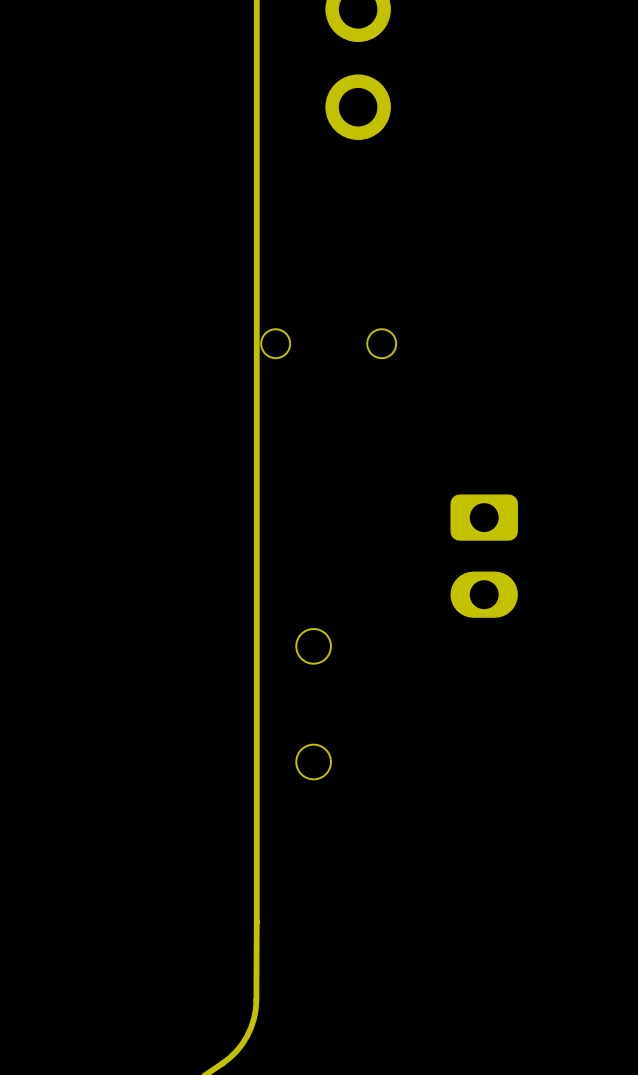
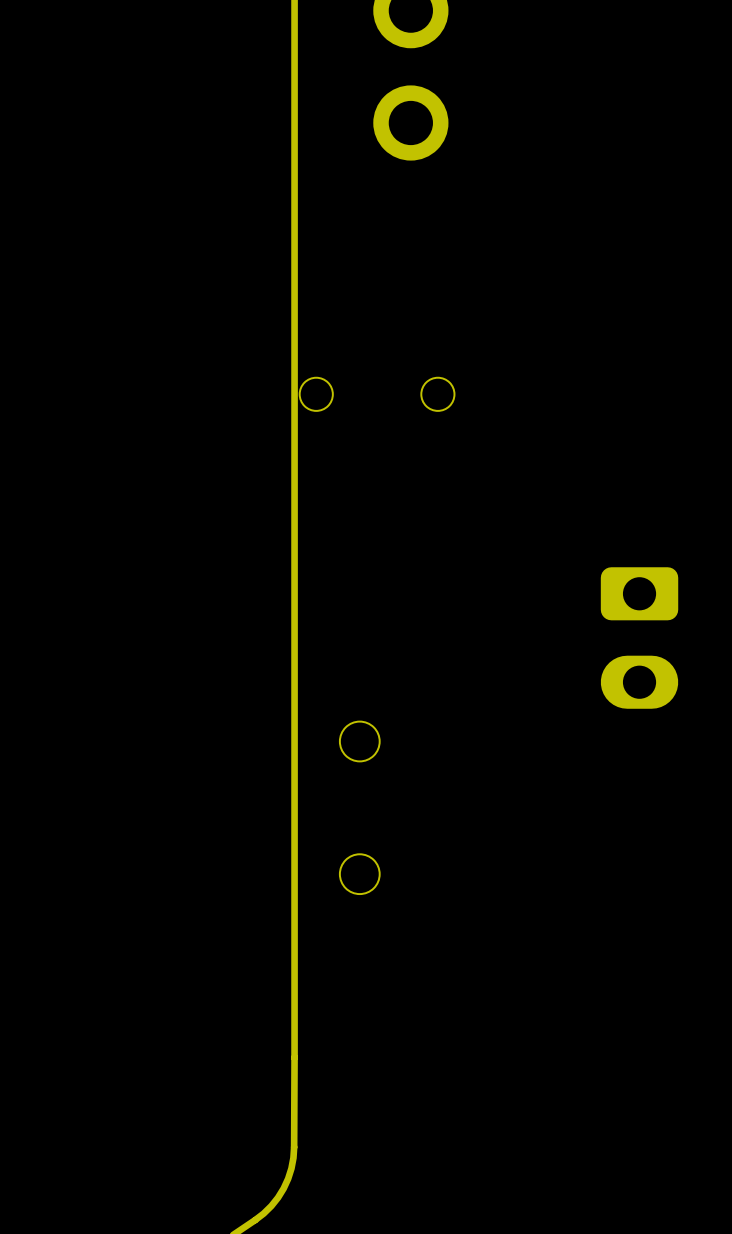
part position: (484, 556) -> (639, 638)

